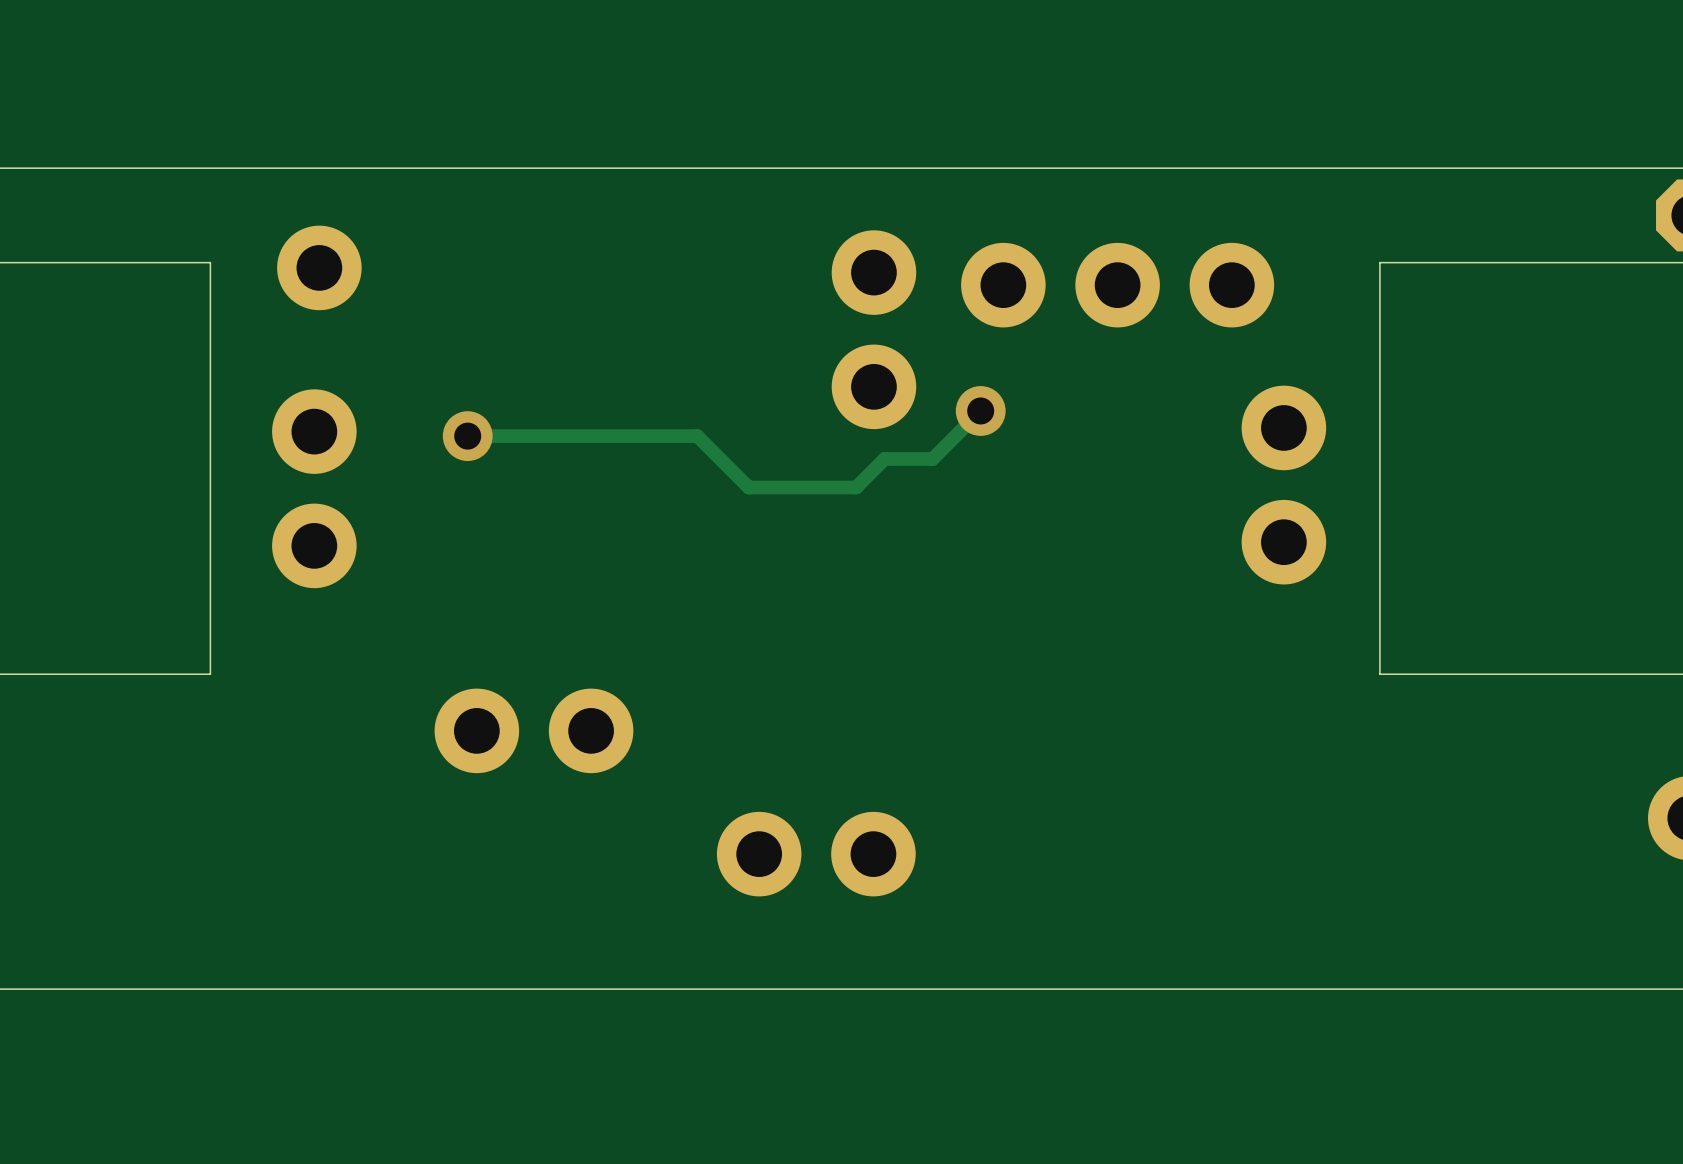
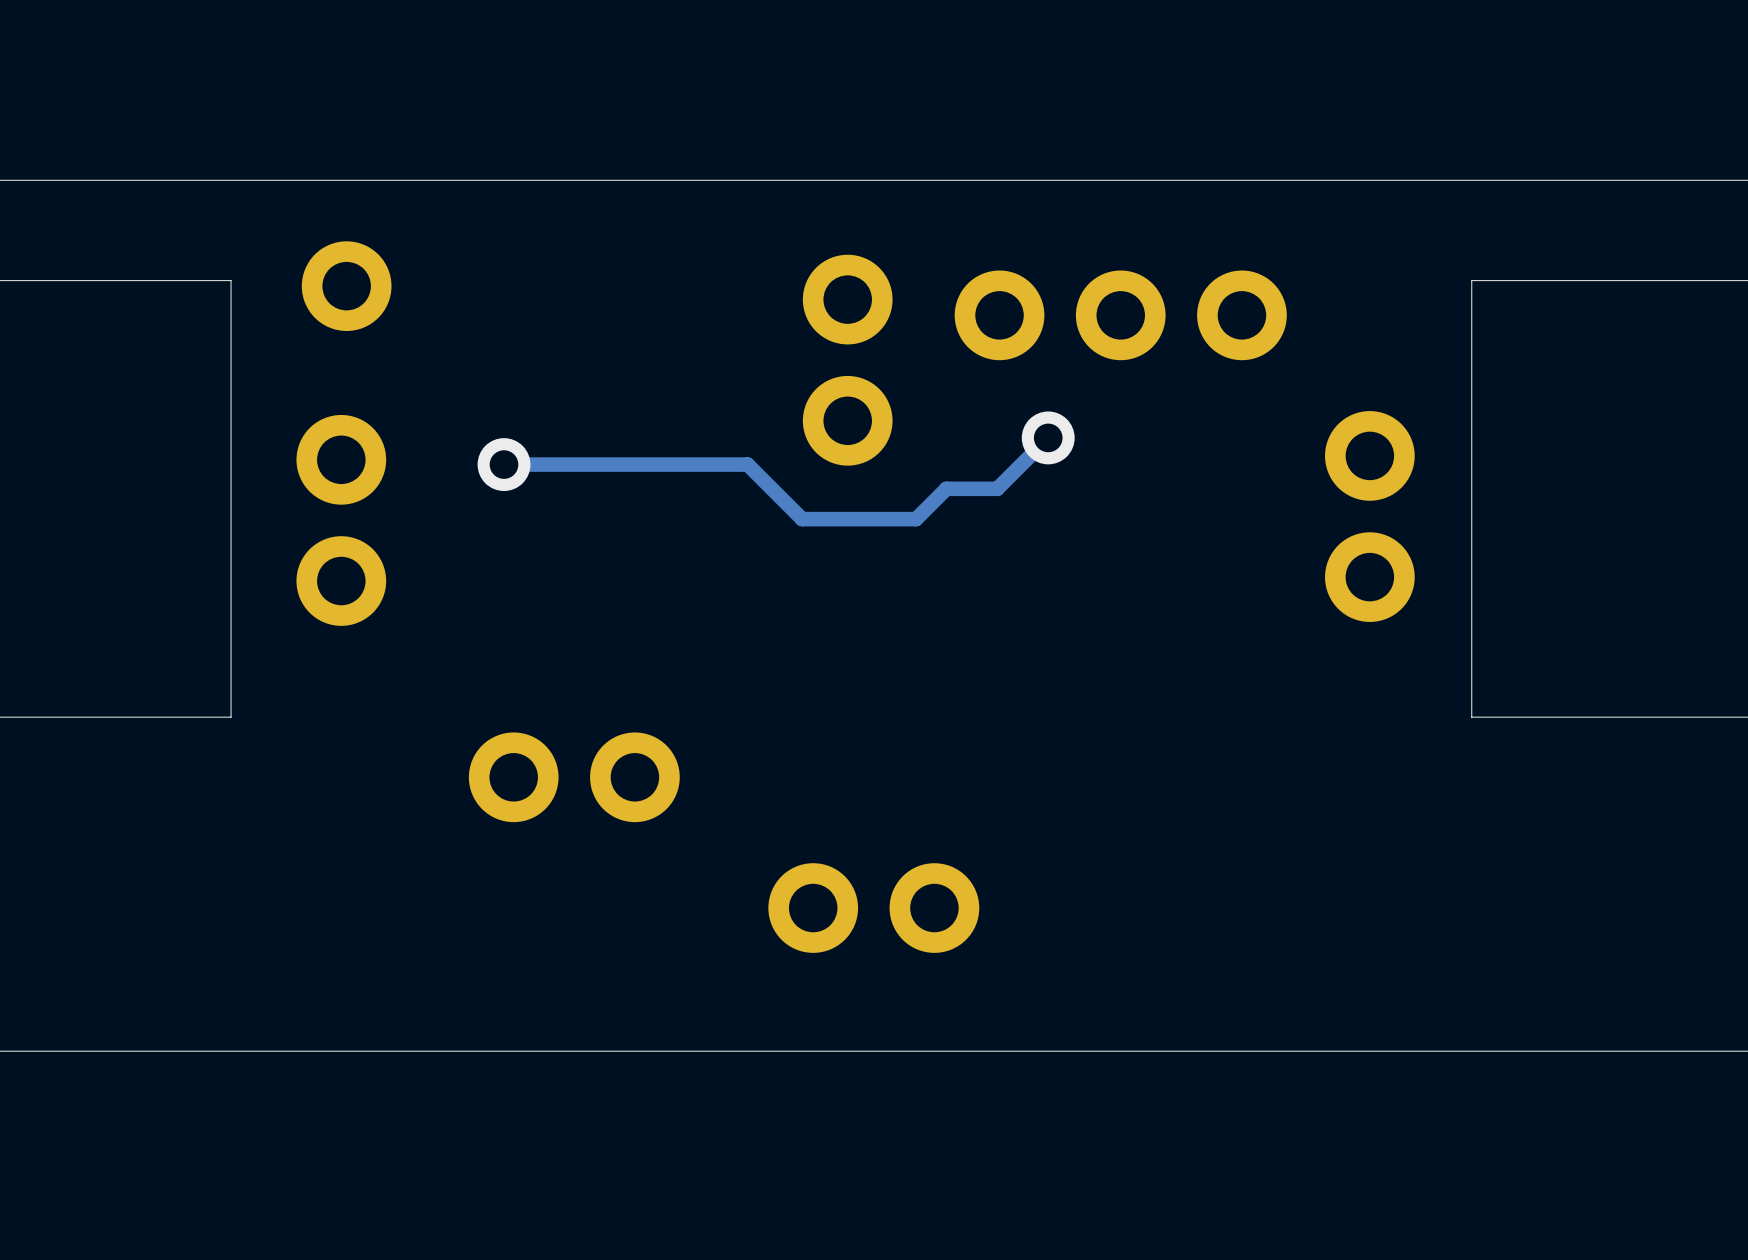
part position: (1117, 285) -> (1120, 315)
part position: (873, 329) -> (847, 360)

